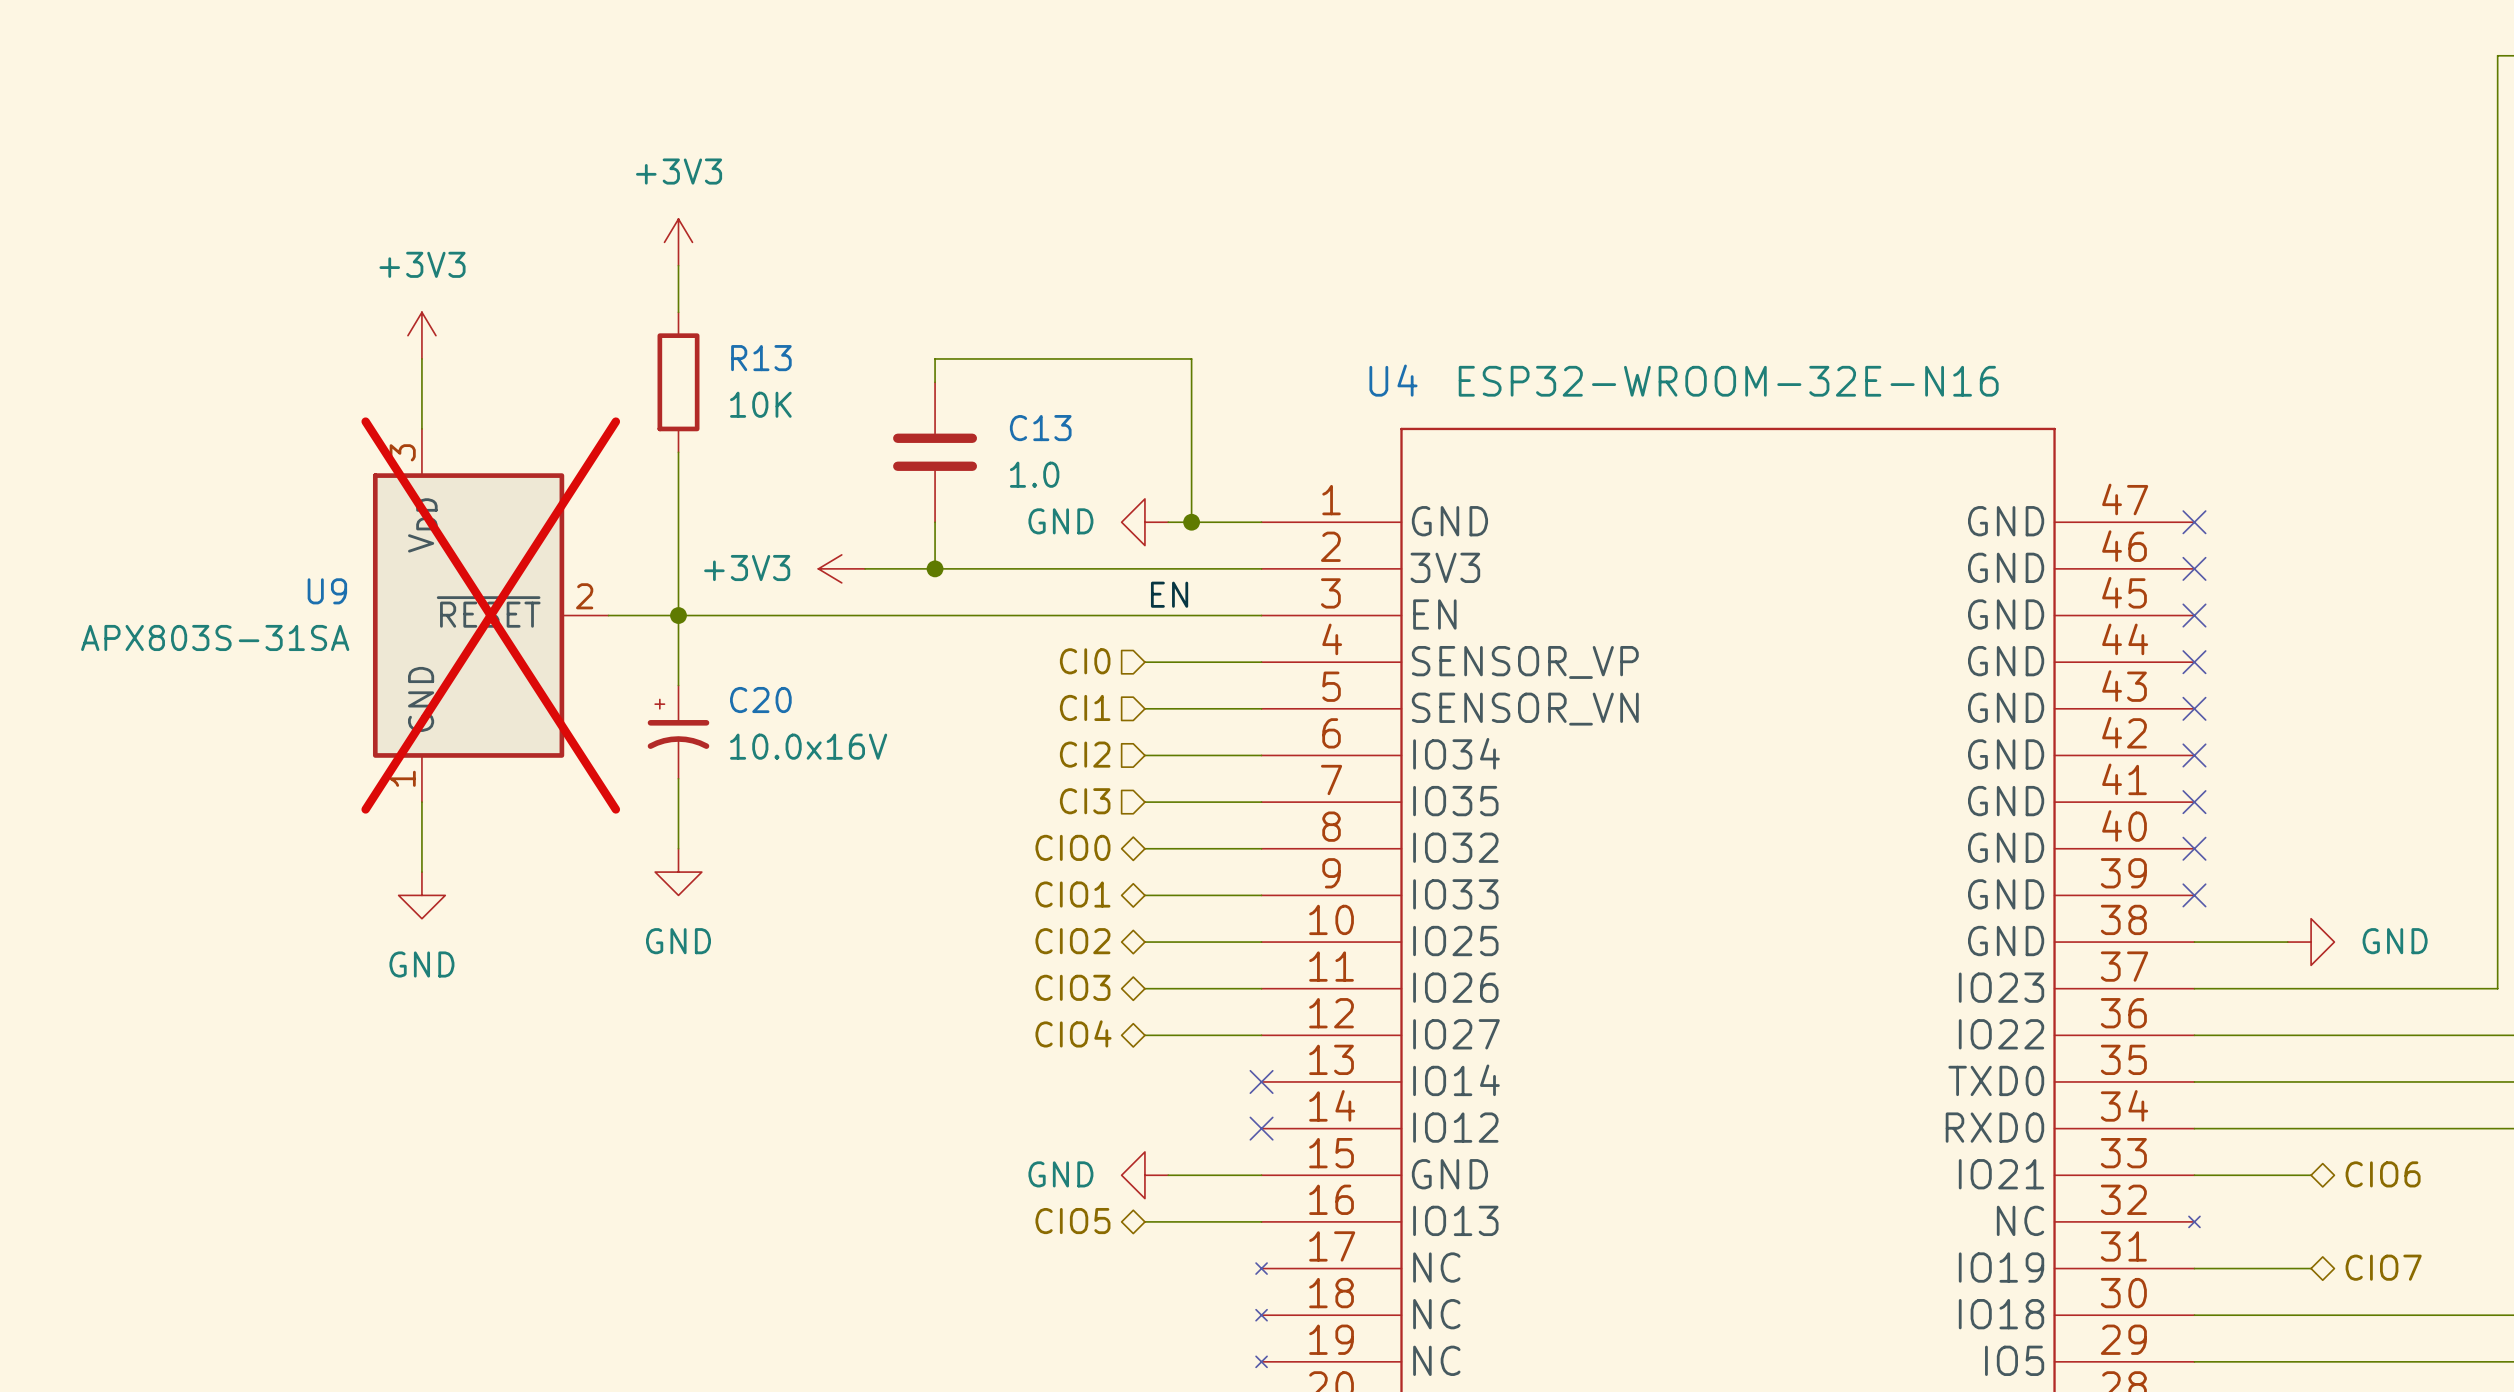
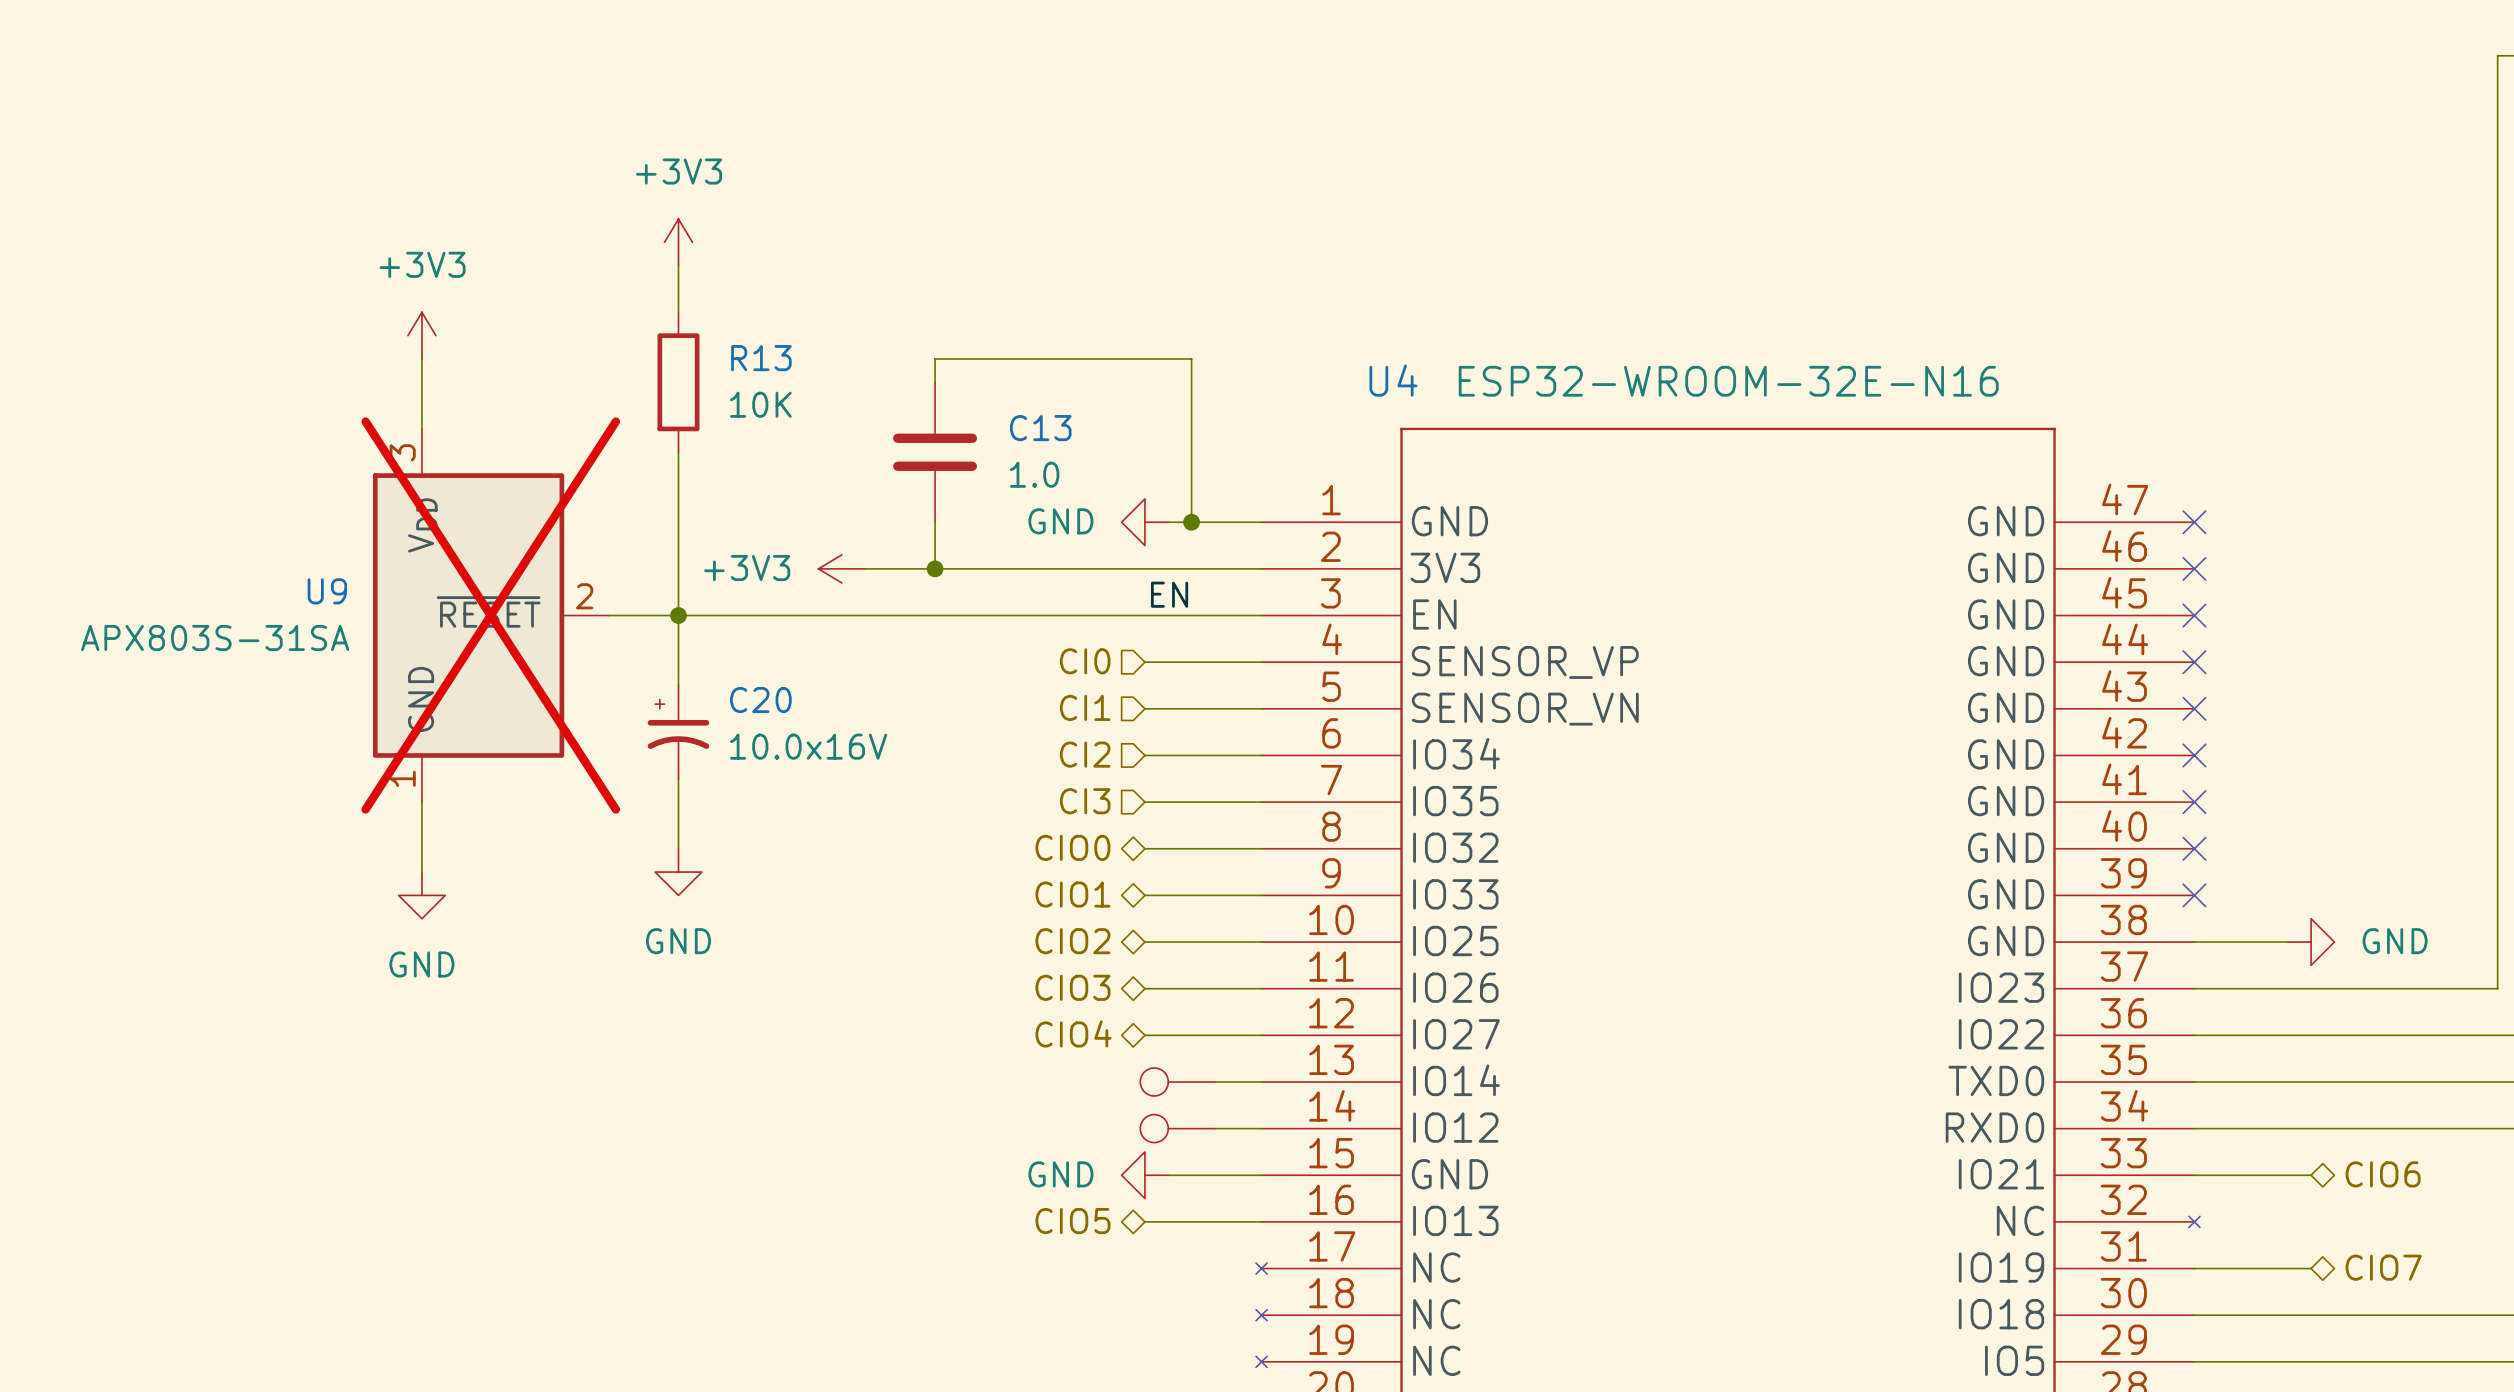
part: none -> (1177, 1081)
wire: none -> (1214, 1081) (1261, 1081)
no-connect mark: (1261, 1081) -> none
part: none -> (1177, 1128)
wire: none -> (1214, 1128) (1261, 1128)
no-connect mark: (1261, 1128) -> none

